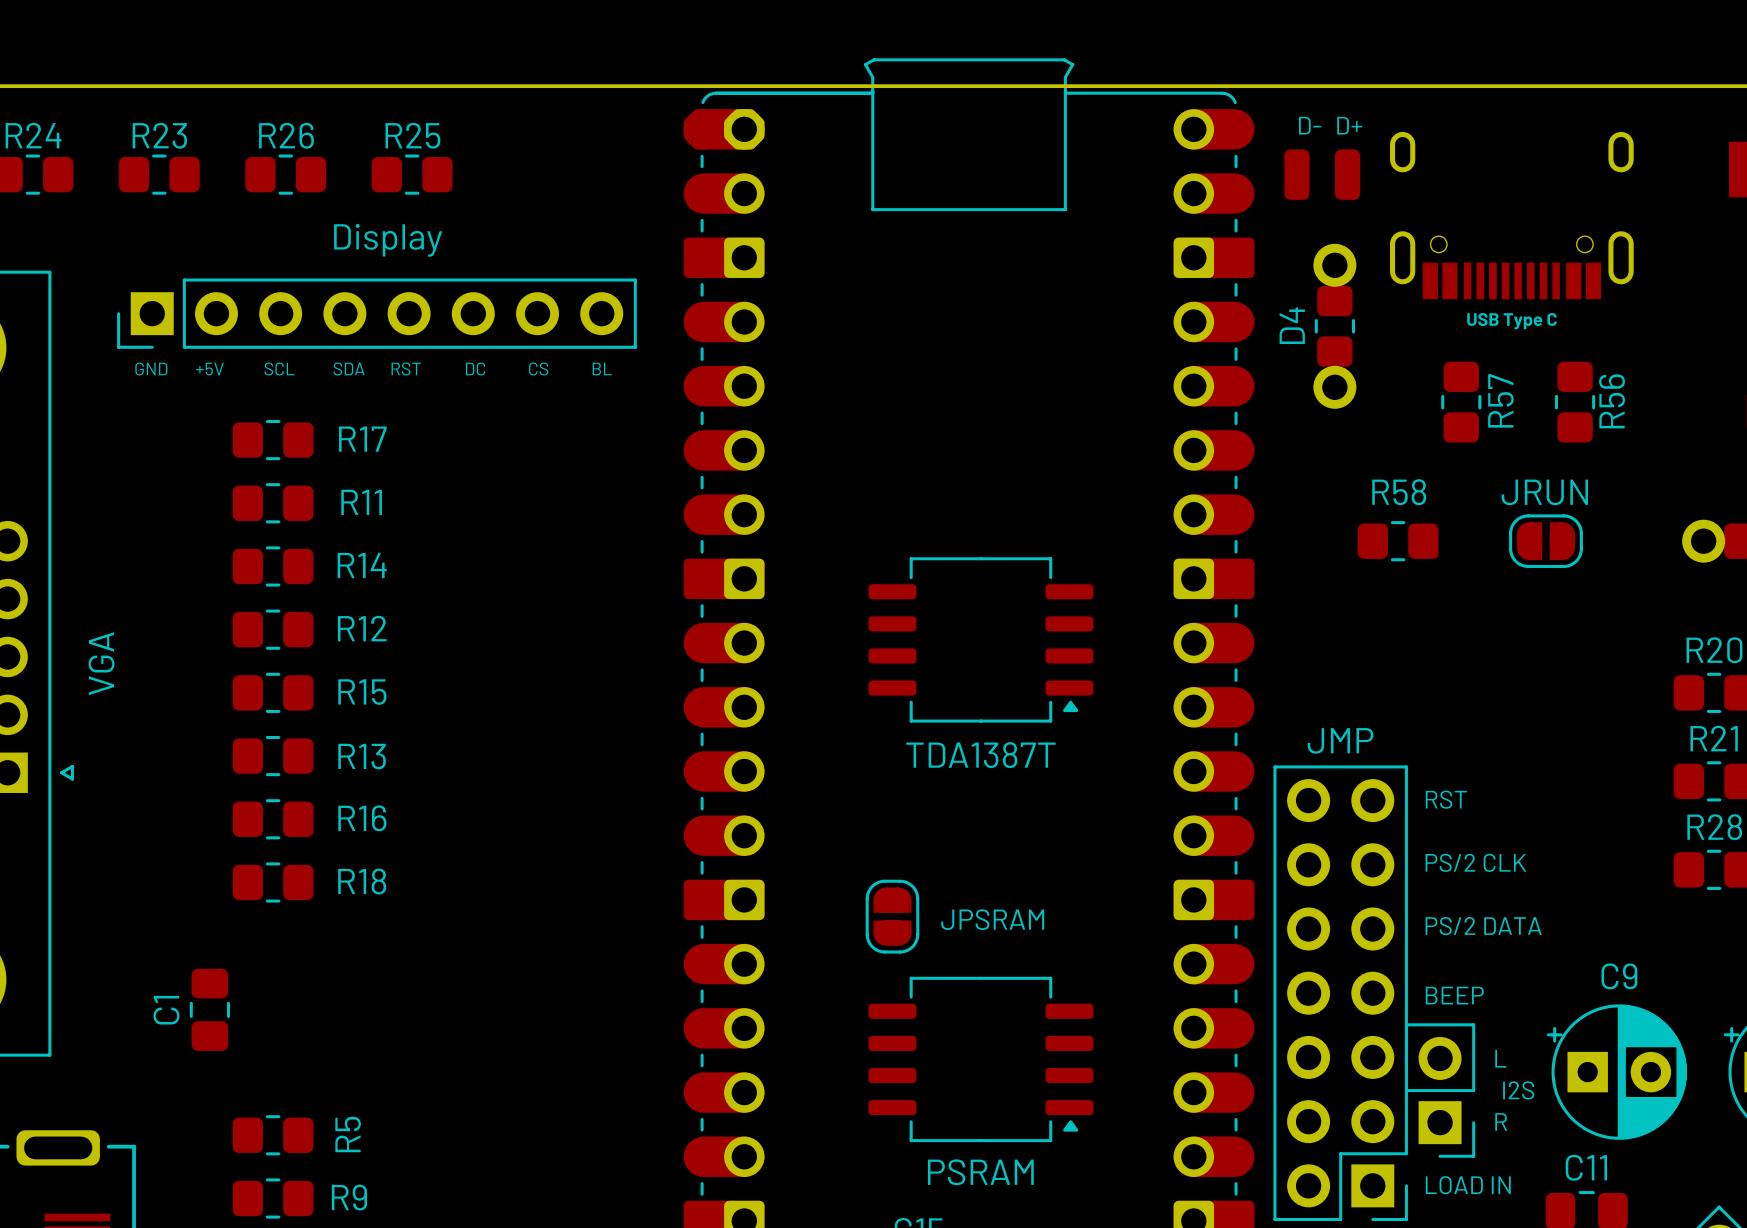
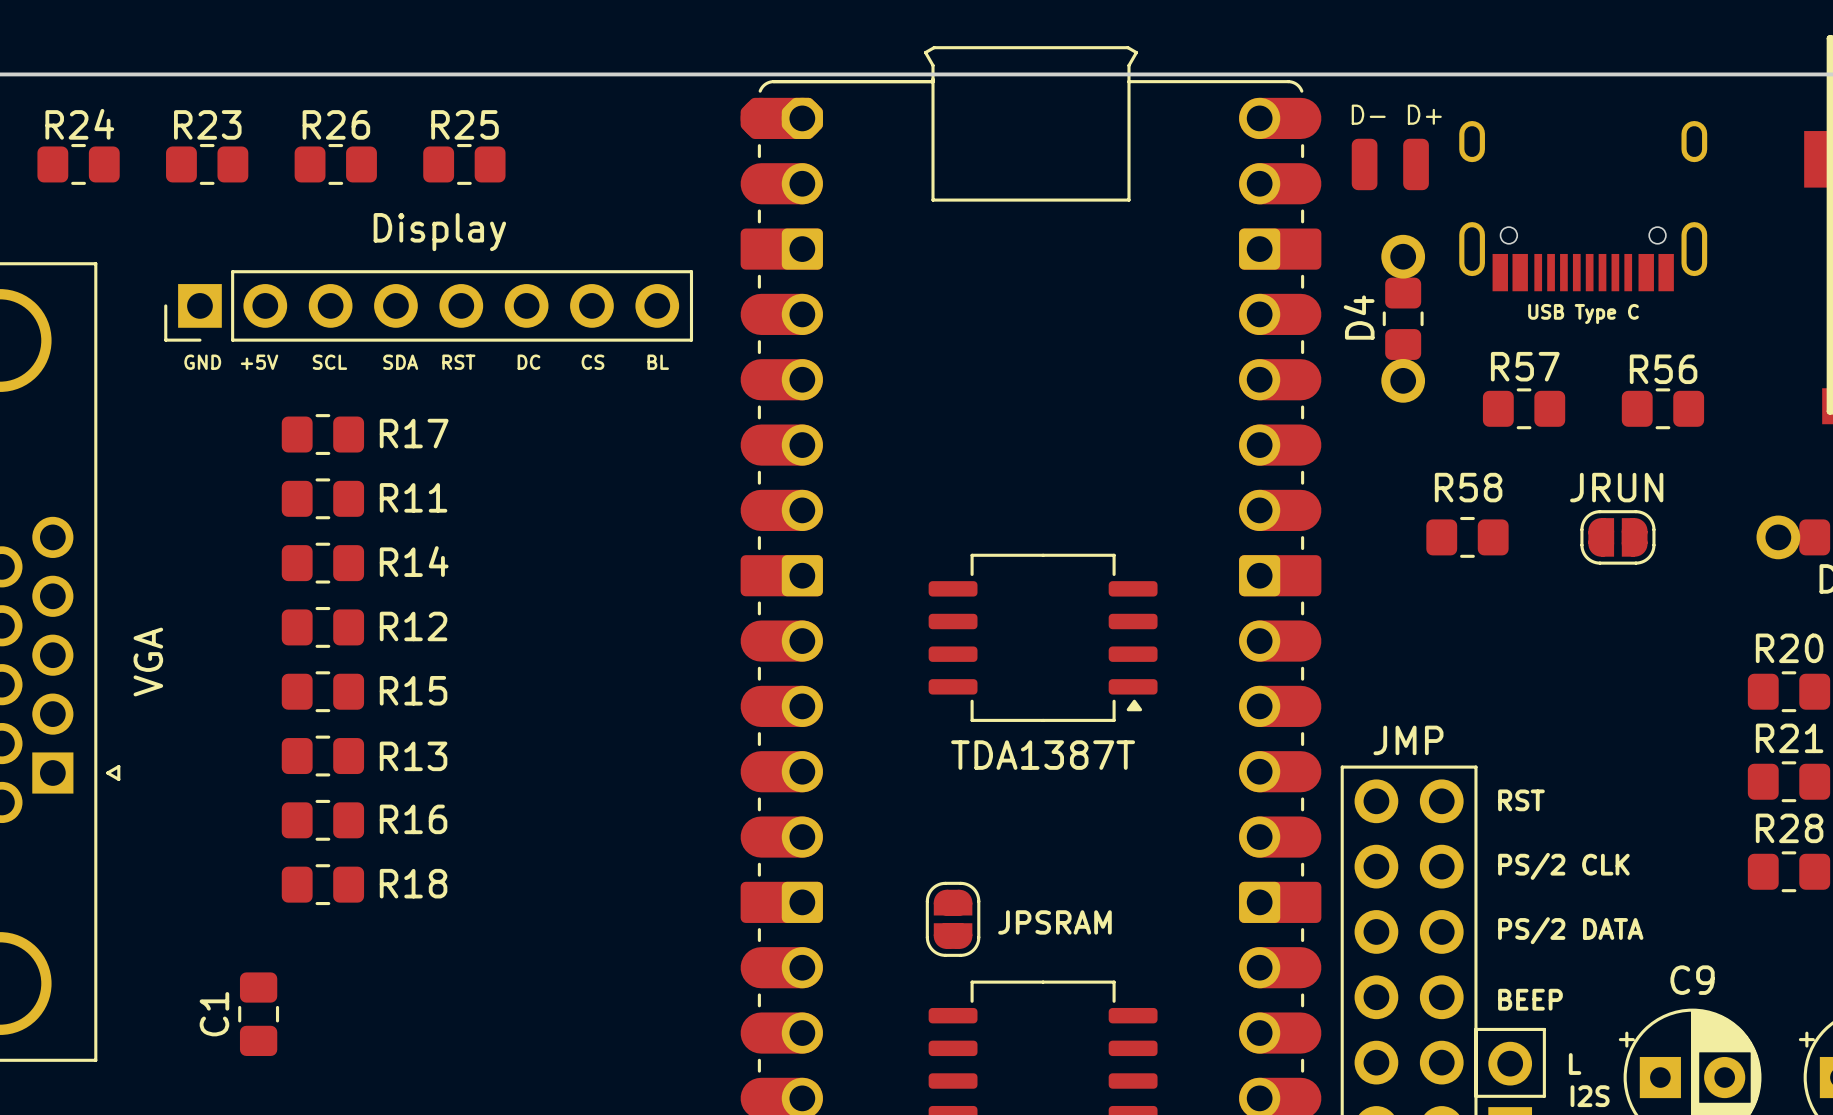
R57 name position: R57 (1500, 400) -> R57 (1525, 366)
R56 name position: R56 (1612, 401) -> R56 (1663, 369)
R57 rotation: 0° (1461, 402) -> 90° clockwise (1524, 408)
R56 rotation: 0° (1575, 402) -> 90° clockwise (1662, 408)

